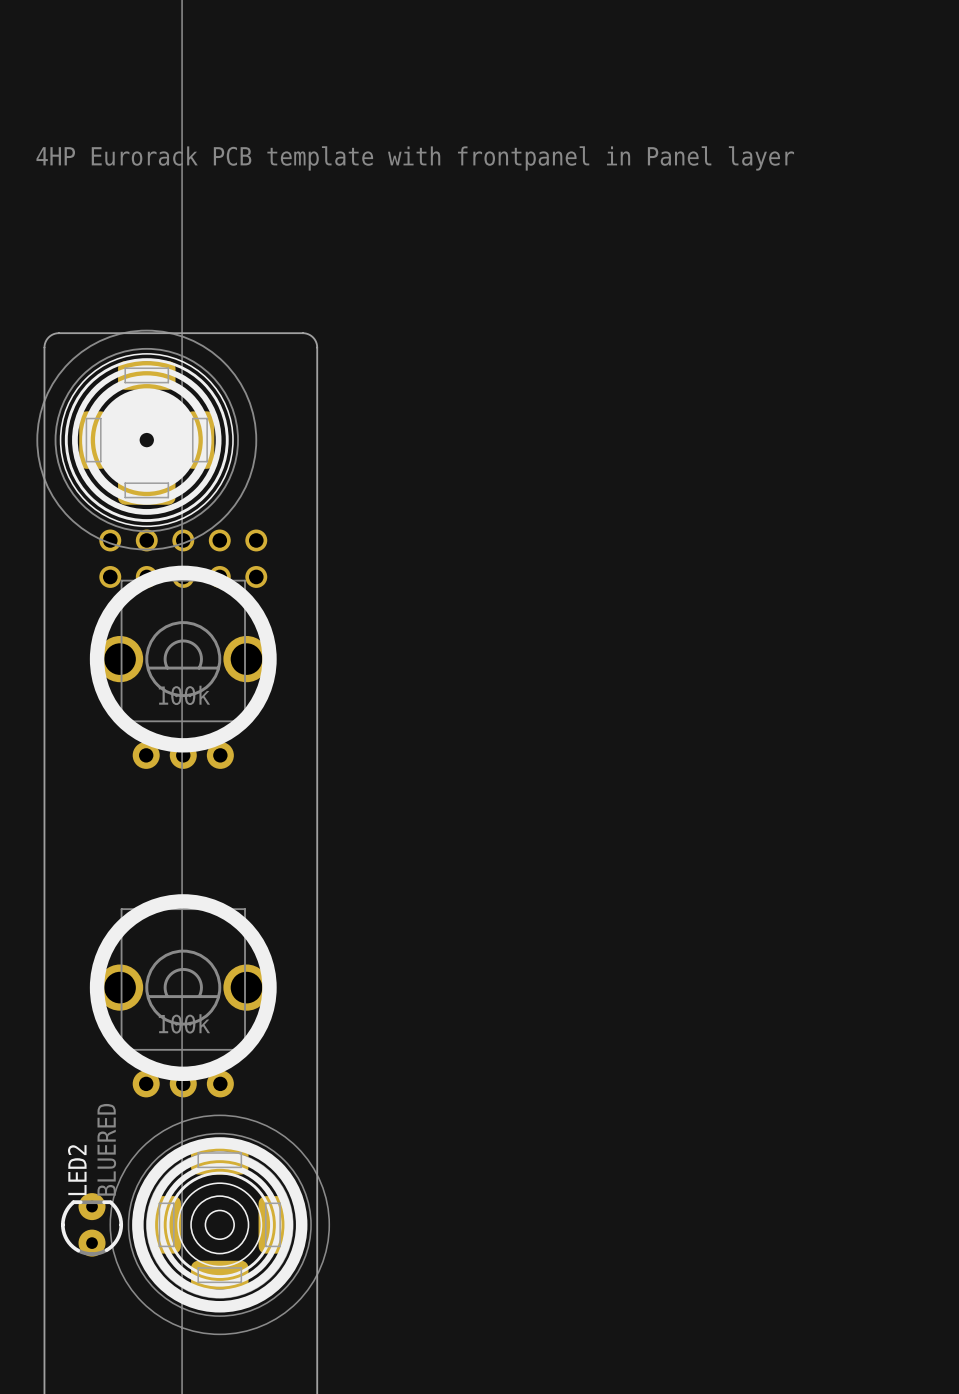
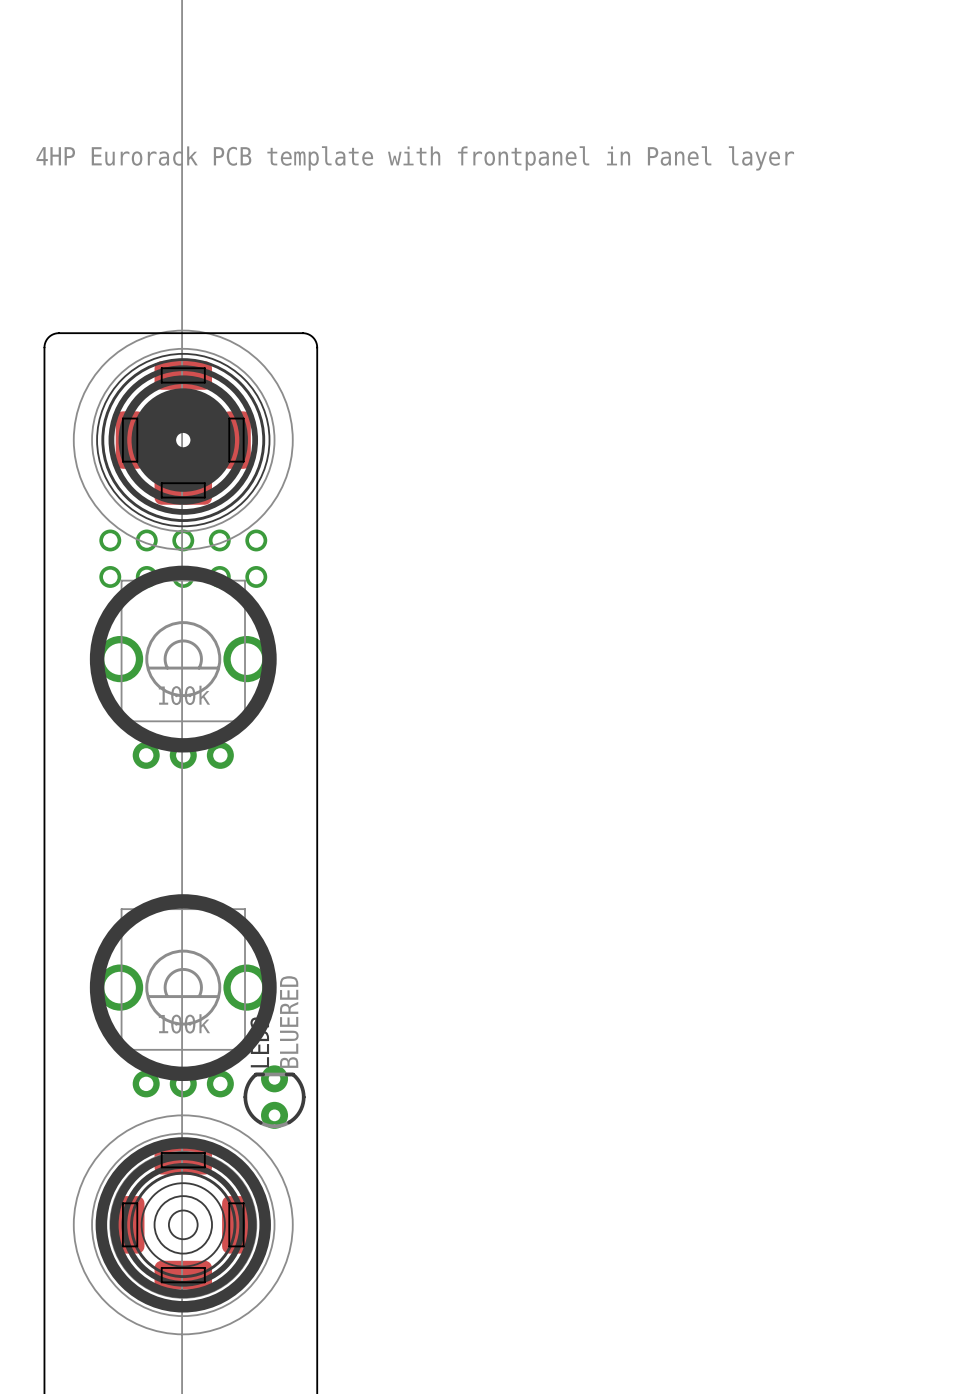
part position: (146, 440) -> (183, 440)
LED2 position: (92, 1224) -> (274, 1097)
part position: (219, 1224) -> (183, 1224)

